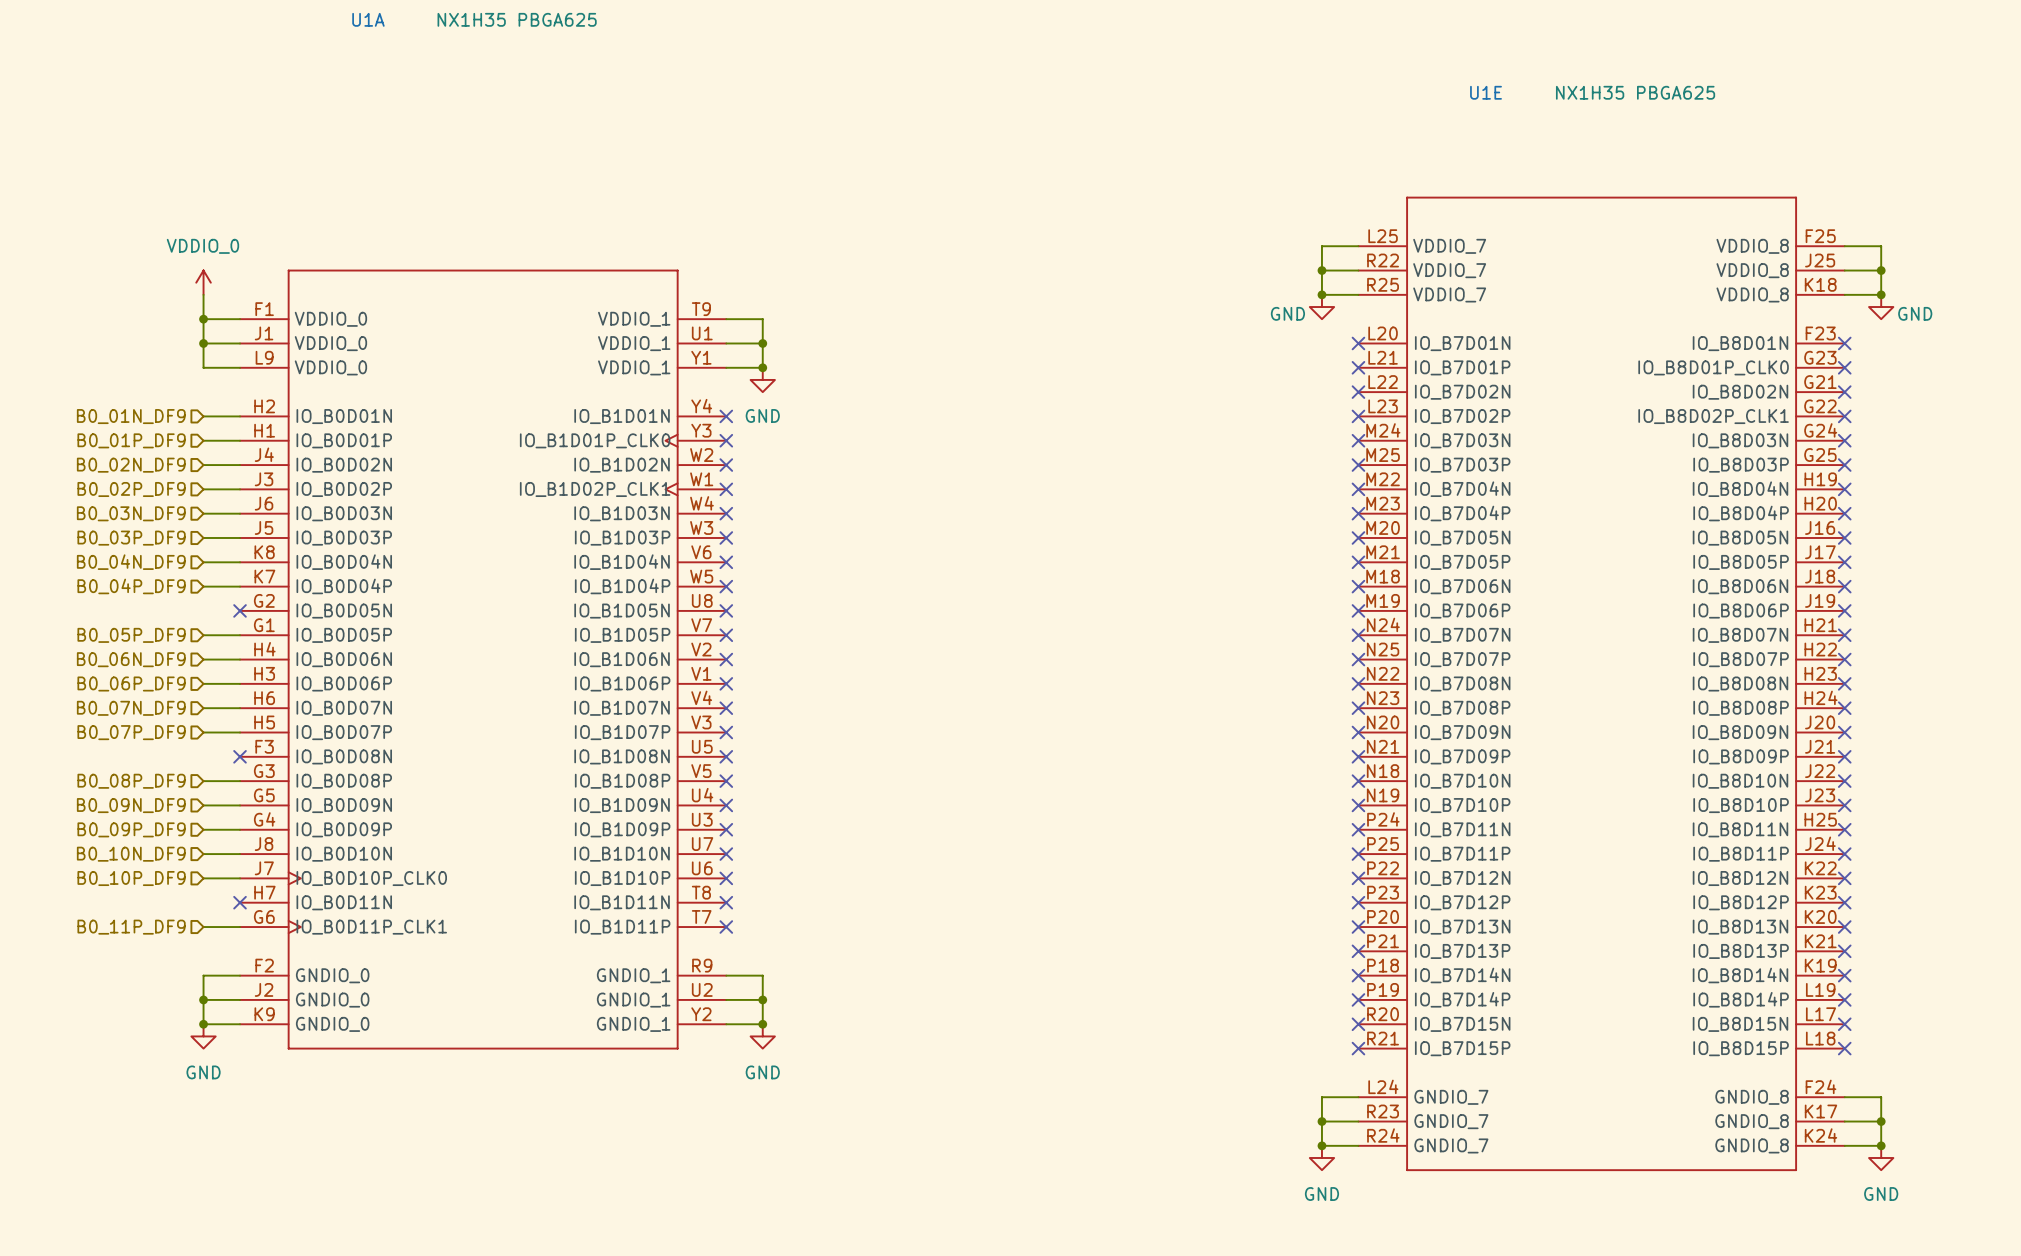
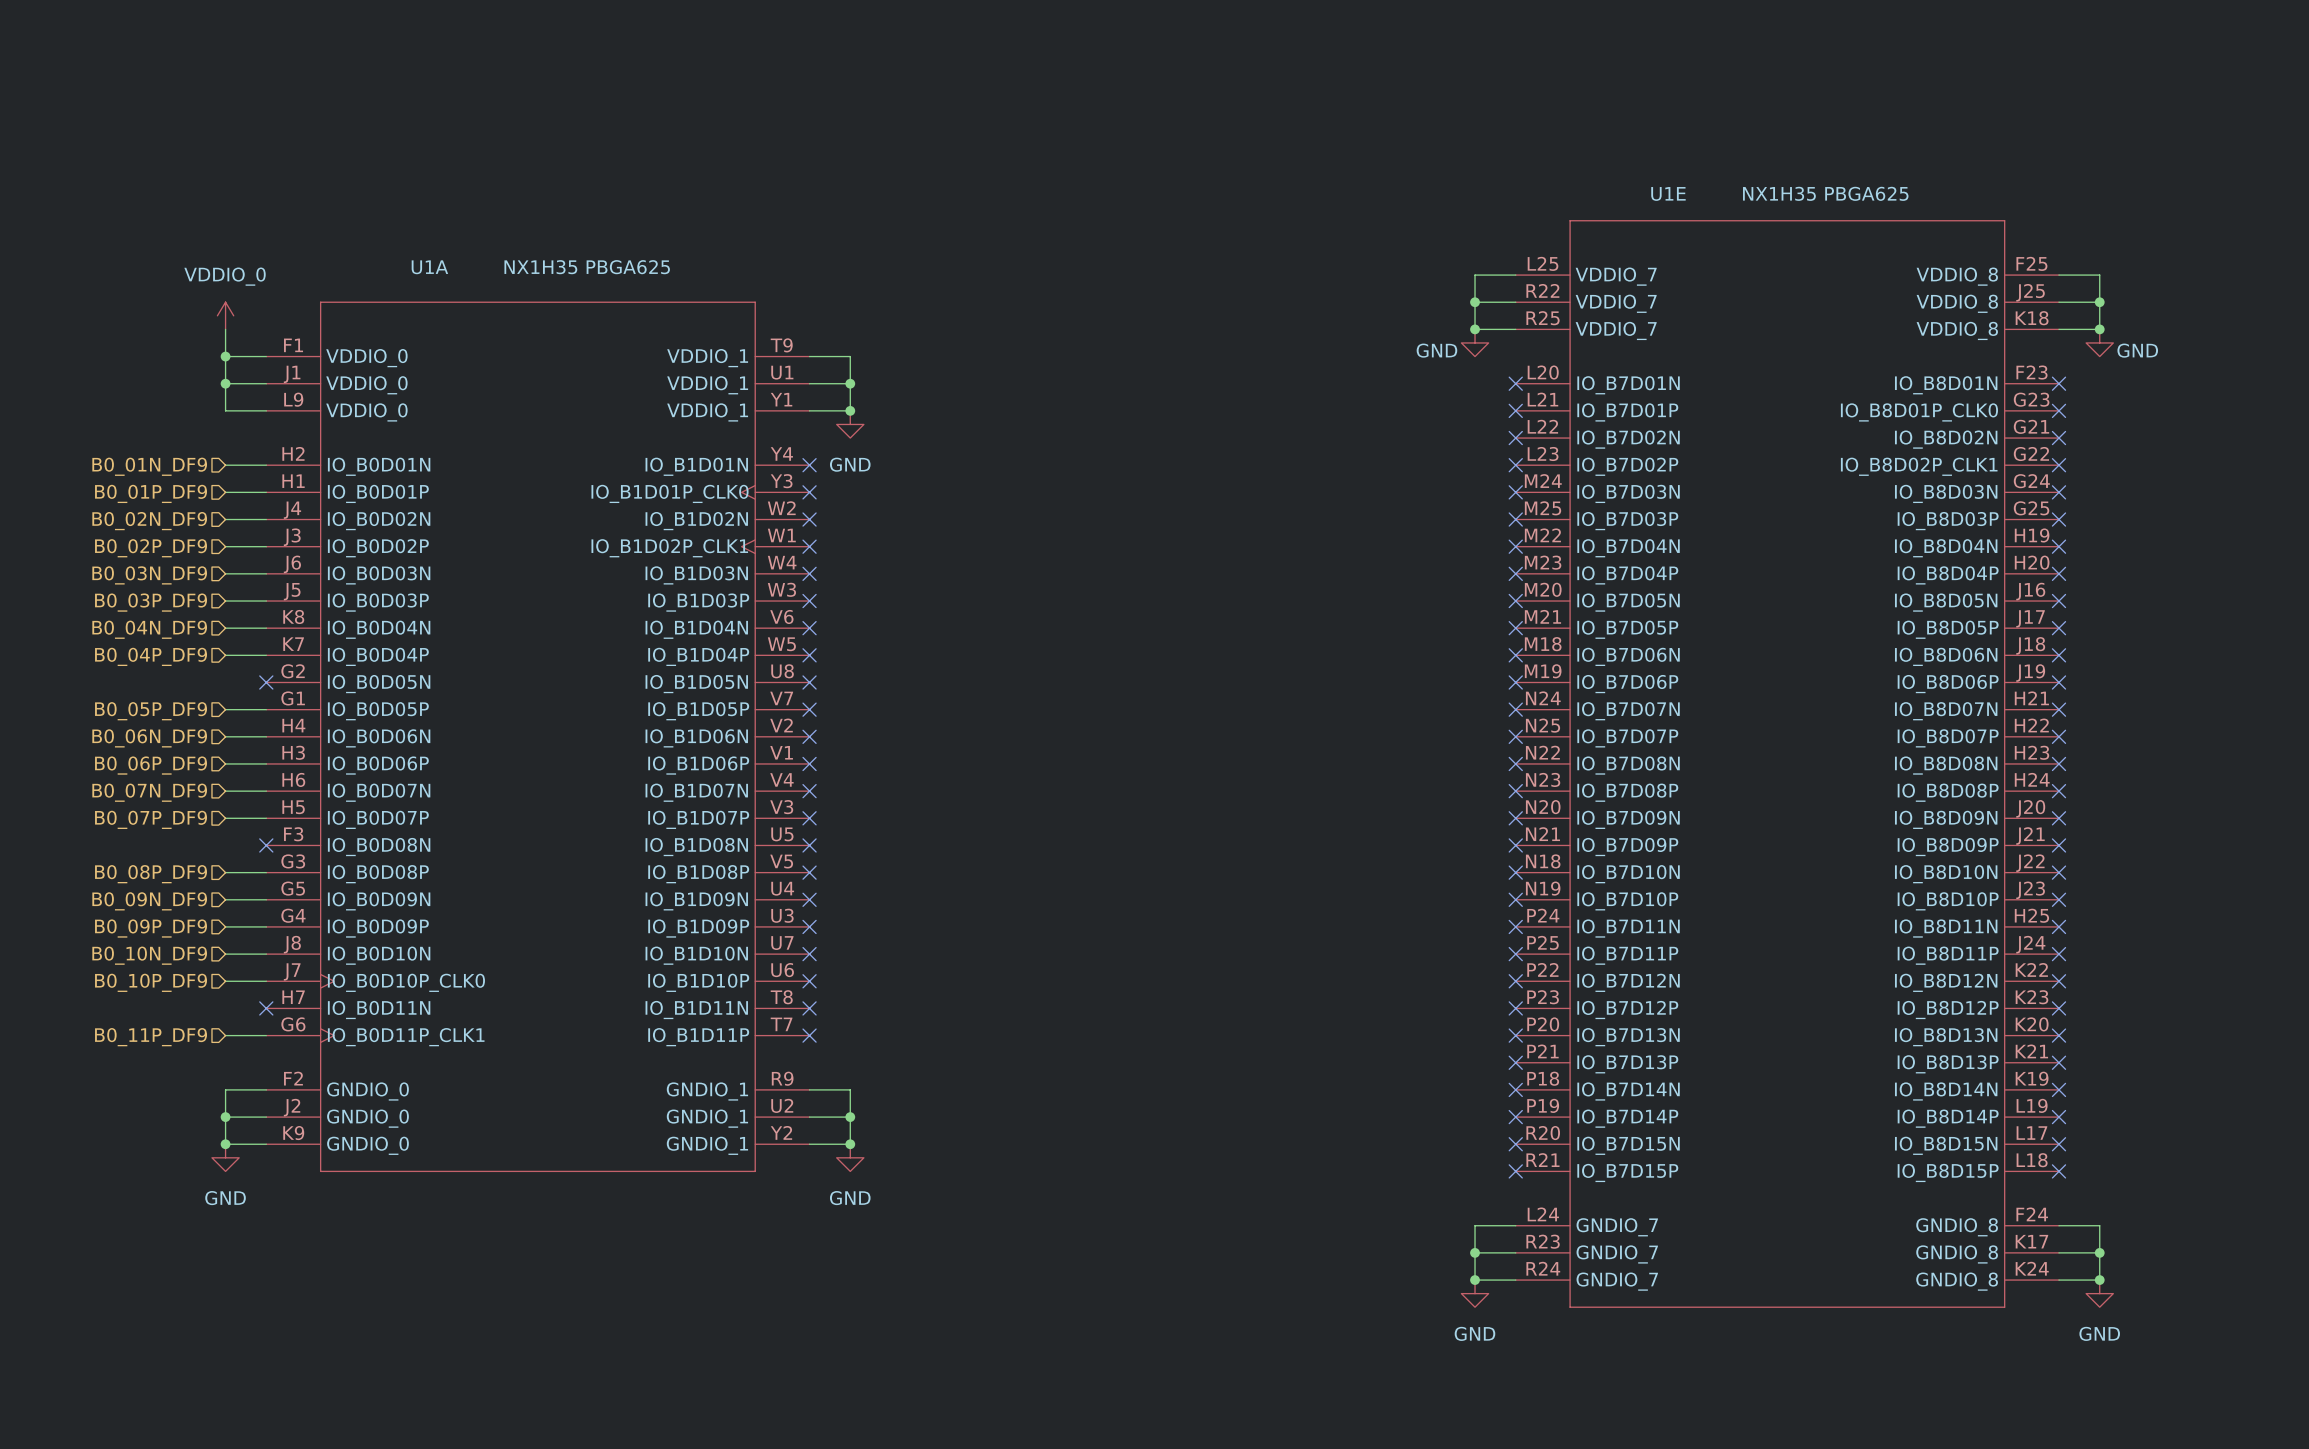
U1A name position: U1A (368, 19) -> U1A (429, 267)
U1A value position: NX1H35 PBGA625 (517, 19) -> NX1H35 PBGA625 (587, 267)
U1E name position: U1E (1486, 92) -> U1E (1668, 193)
U1E value position: NX1H35 PBGA625 (1635, 92) -> NX1H35 PBGA625 (1825, 193)

